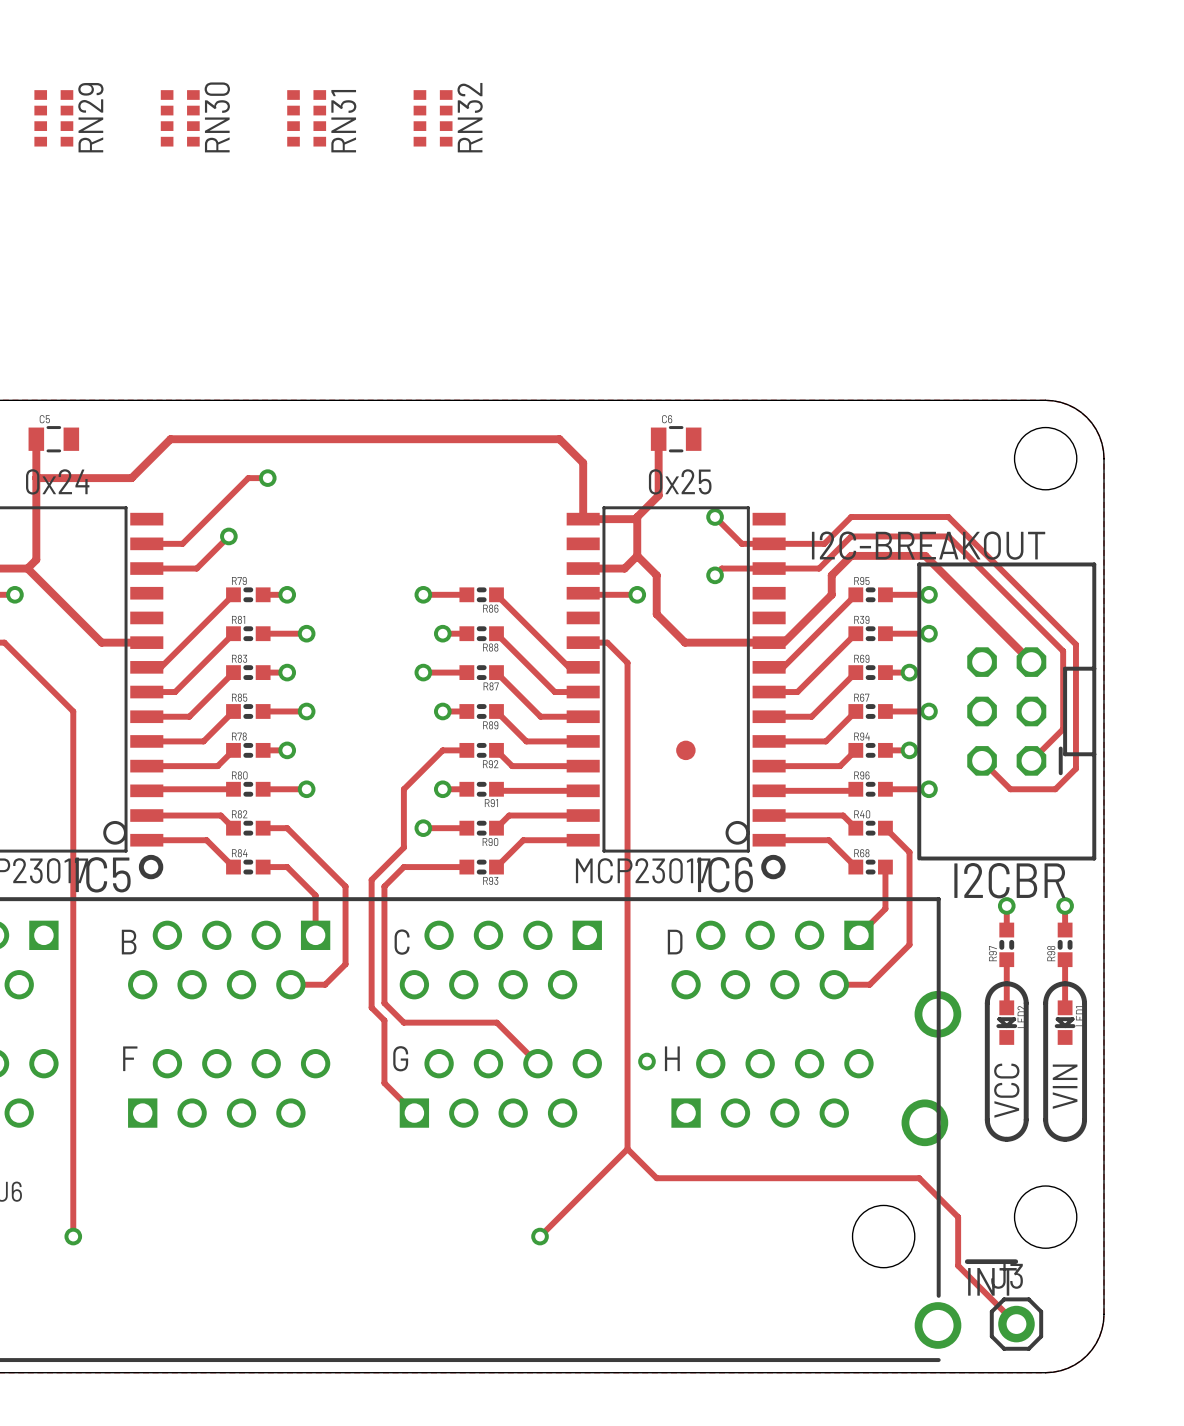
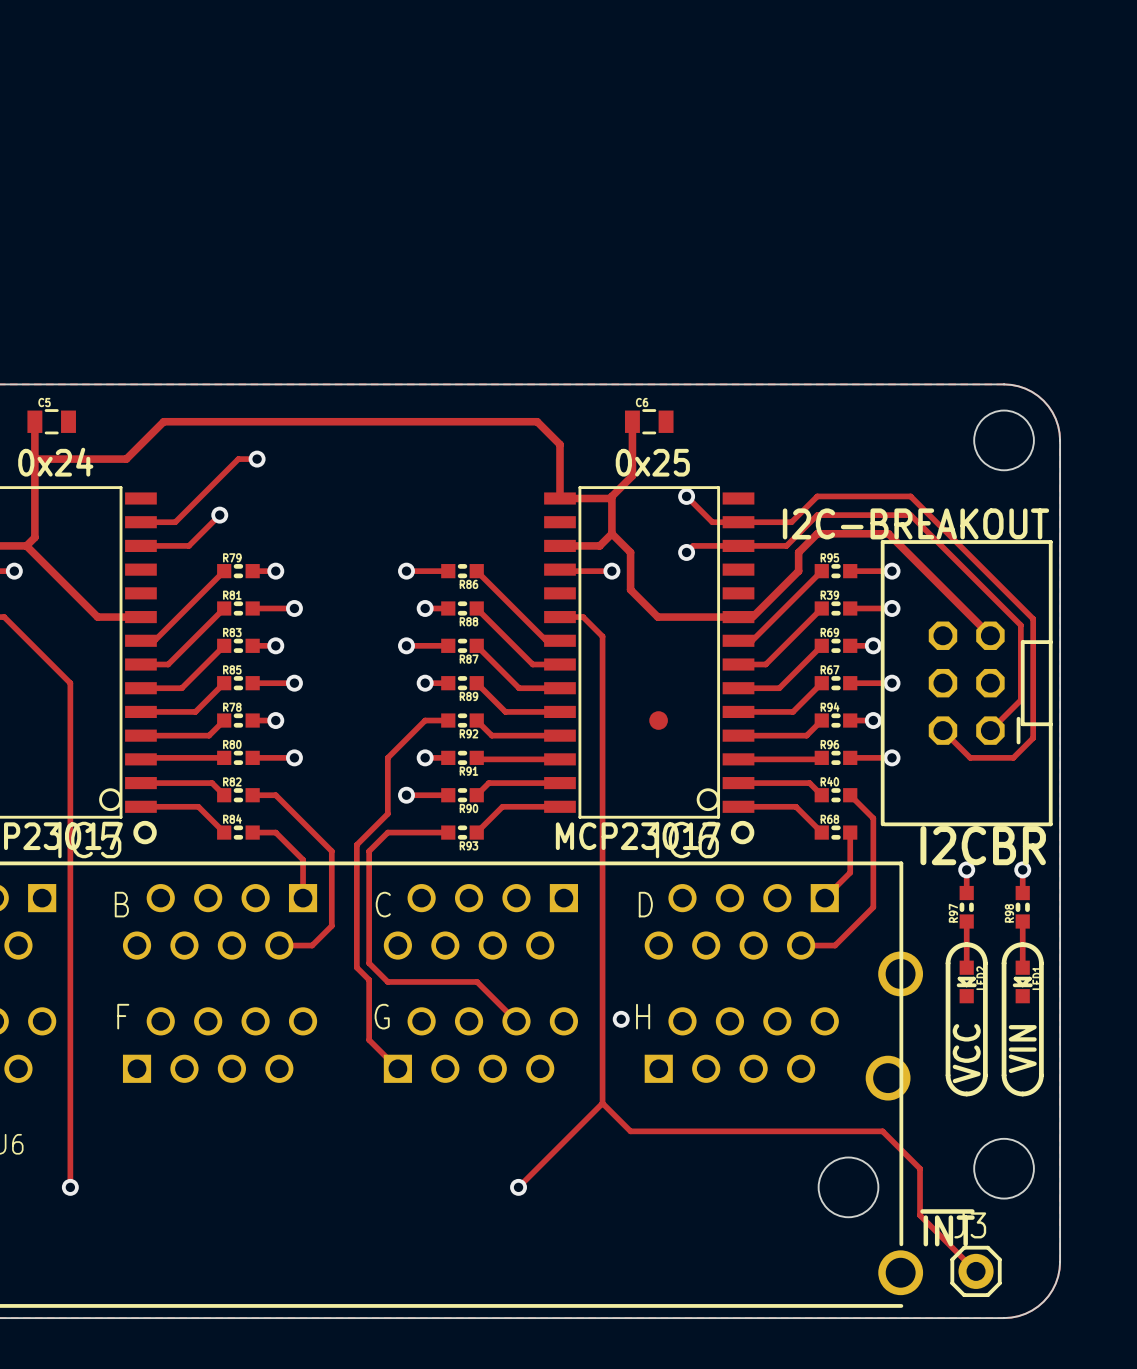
RN29: (53, 118) -> none
RN30: (180, 118) -> none
RN31: (306, 118) -> none
RN32: (433, 118) -> none

